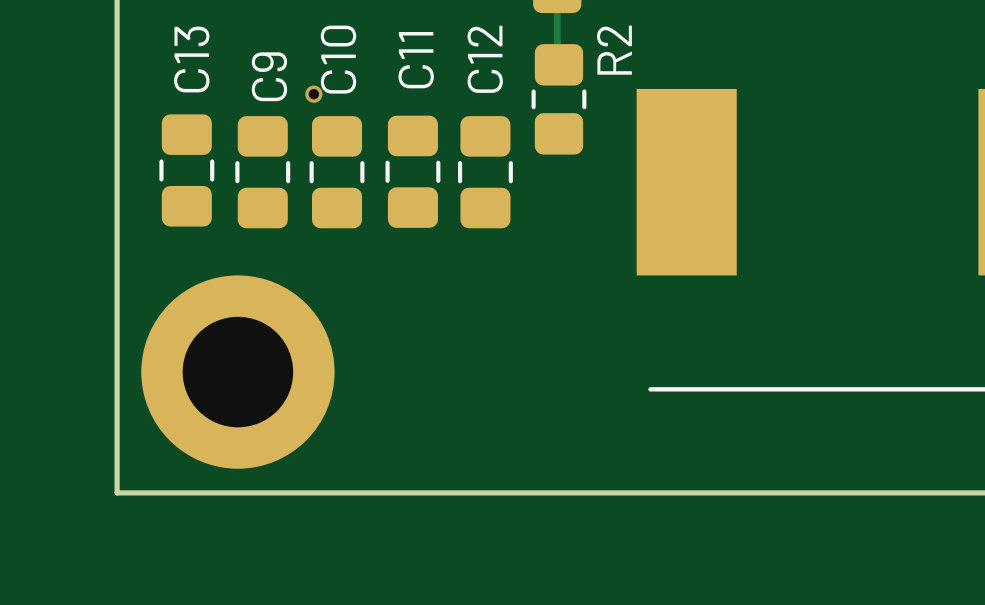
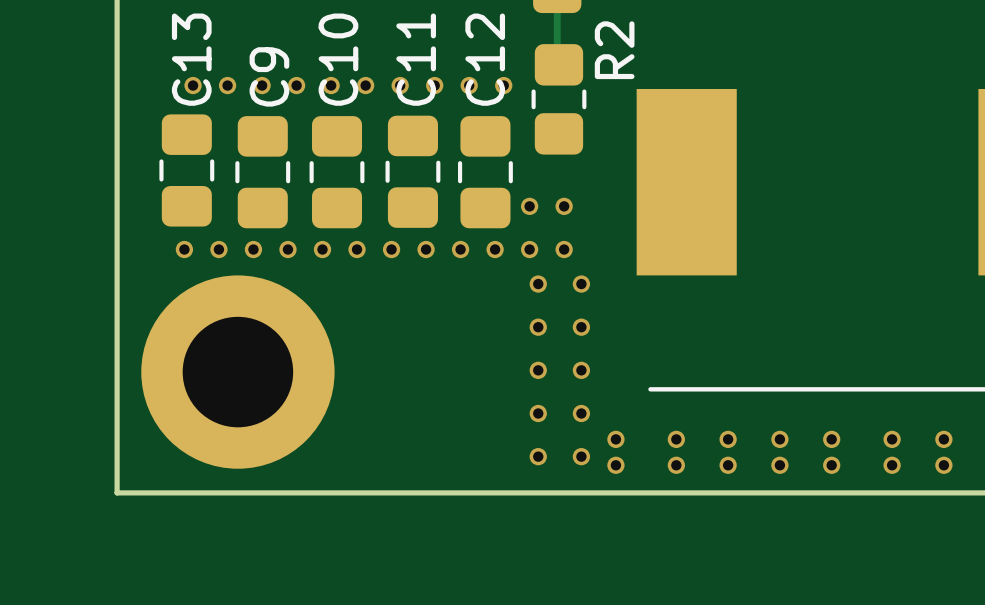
via: none -> (193, 85)
via: none -> (227, 85)
via: none -> (262, 85)
via: none -> (296, 85)
via: none -> (331, 85)
via: none -> (365, 85)
via: none -> (400, 85)
via: none -> (434, 85)
via: none -> (469, 85)
via: none -> (503, 85)
via: (313, 94) -> none
via: none -> (529, 206)
via: none -> (564, 206)
via: none -> (184, 249)
via: none -> (218, 249)
via: none -> (253, 249)
via: none -> (287, 249)
via: none -> (322, 249)
via: none -> (357, 249)
via: none -> (391, 249)
via: none -> (426, 249)
via: none -> (460, 249)
via: none -> (495, 249)
via: none -> (529, 249)
via: none -> (564, 249)
via: none -> (538, 284)
via: none -> (581, 284)
via: none -> (538, 327)
via: none -> (581, 327)
via: none -> (538, 370)
via: none -> (581, 370)
via: none -> (538, 413)
via: none -> (581, 413)
via: none -> (615, 439)
via: none -> (676, 439)
via: none -> (728, 439)
via: none -> (779, 439)
via: none -> (831, 439)
via: none -> (892, 439)
via: none -> (943, 439)
via: none -> (538, 456)
via: none -> (581, 456)
via: none -> (615, 465)
via: none -> (676, 465)
via: none -> (728, 465)
via: none -> (779, 465)
via: none -> (831, 465)
via: none -> (892, 465)
via: none -> (943, 465)

